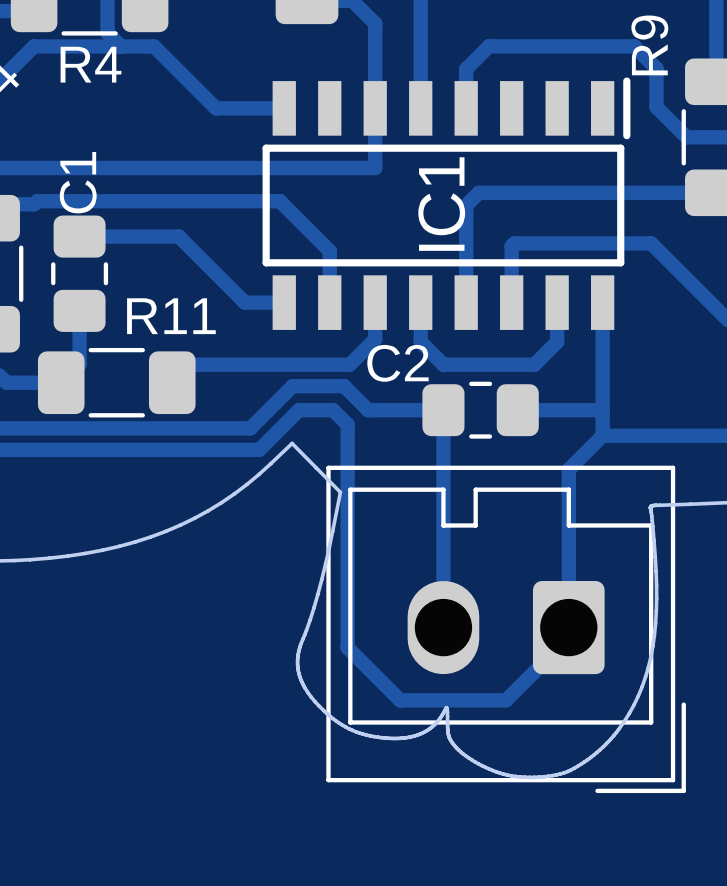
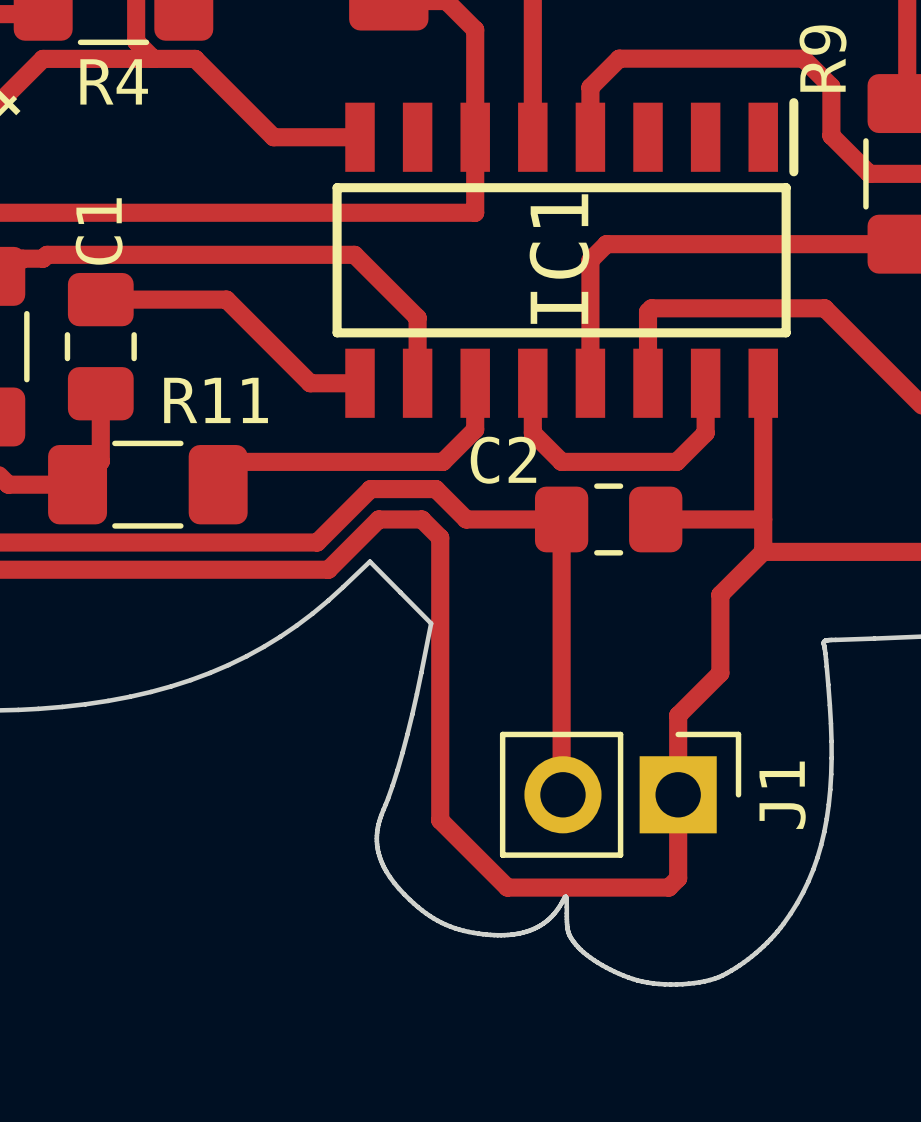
track: (568, 531) (568, 637) (506, 700) (400, 700) -> (720, 673) (678, 715) (678, 878) (668, 887) (507, 887)
J1: none -> (620, 794)
part: (506, 629) -> none

